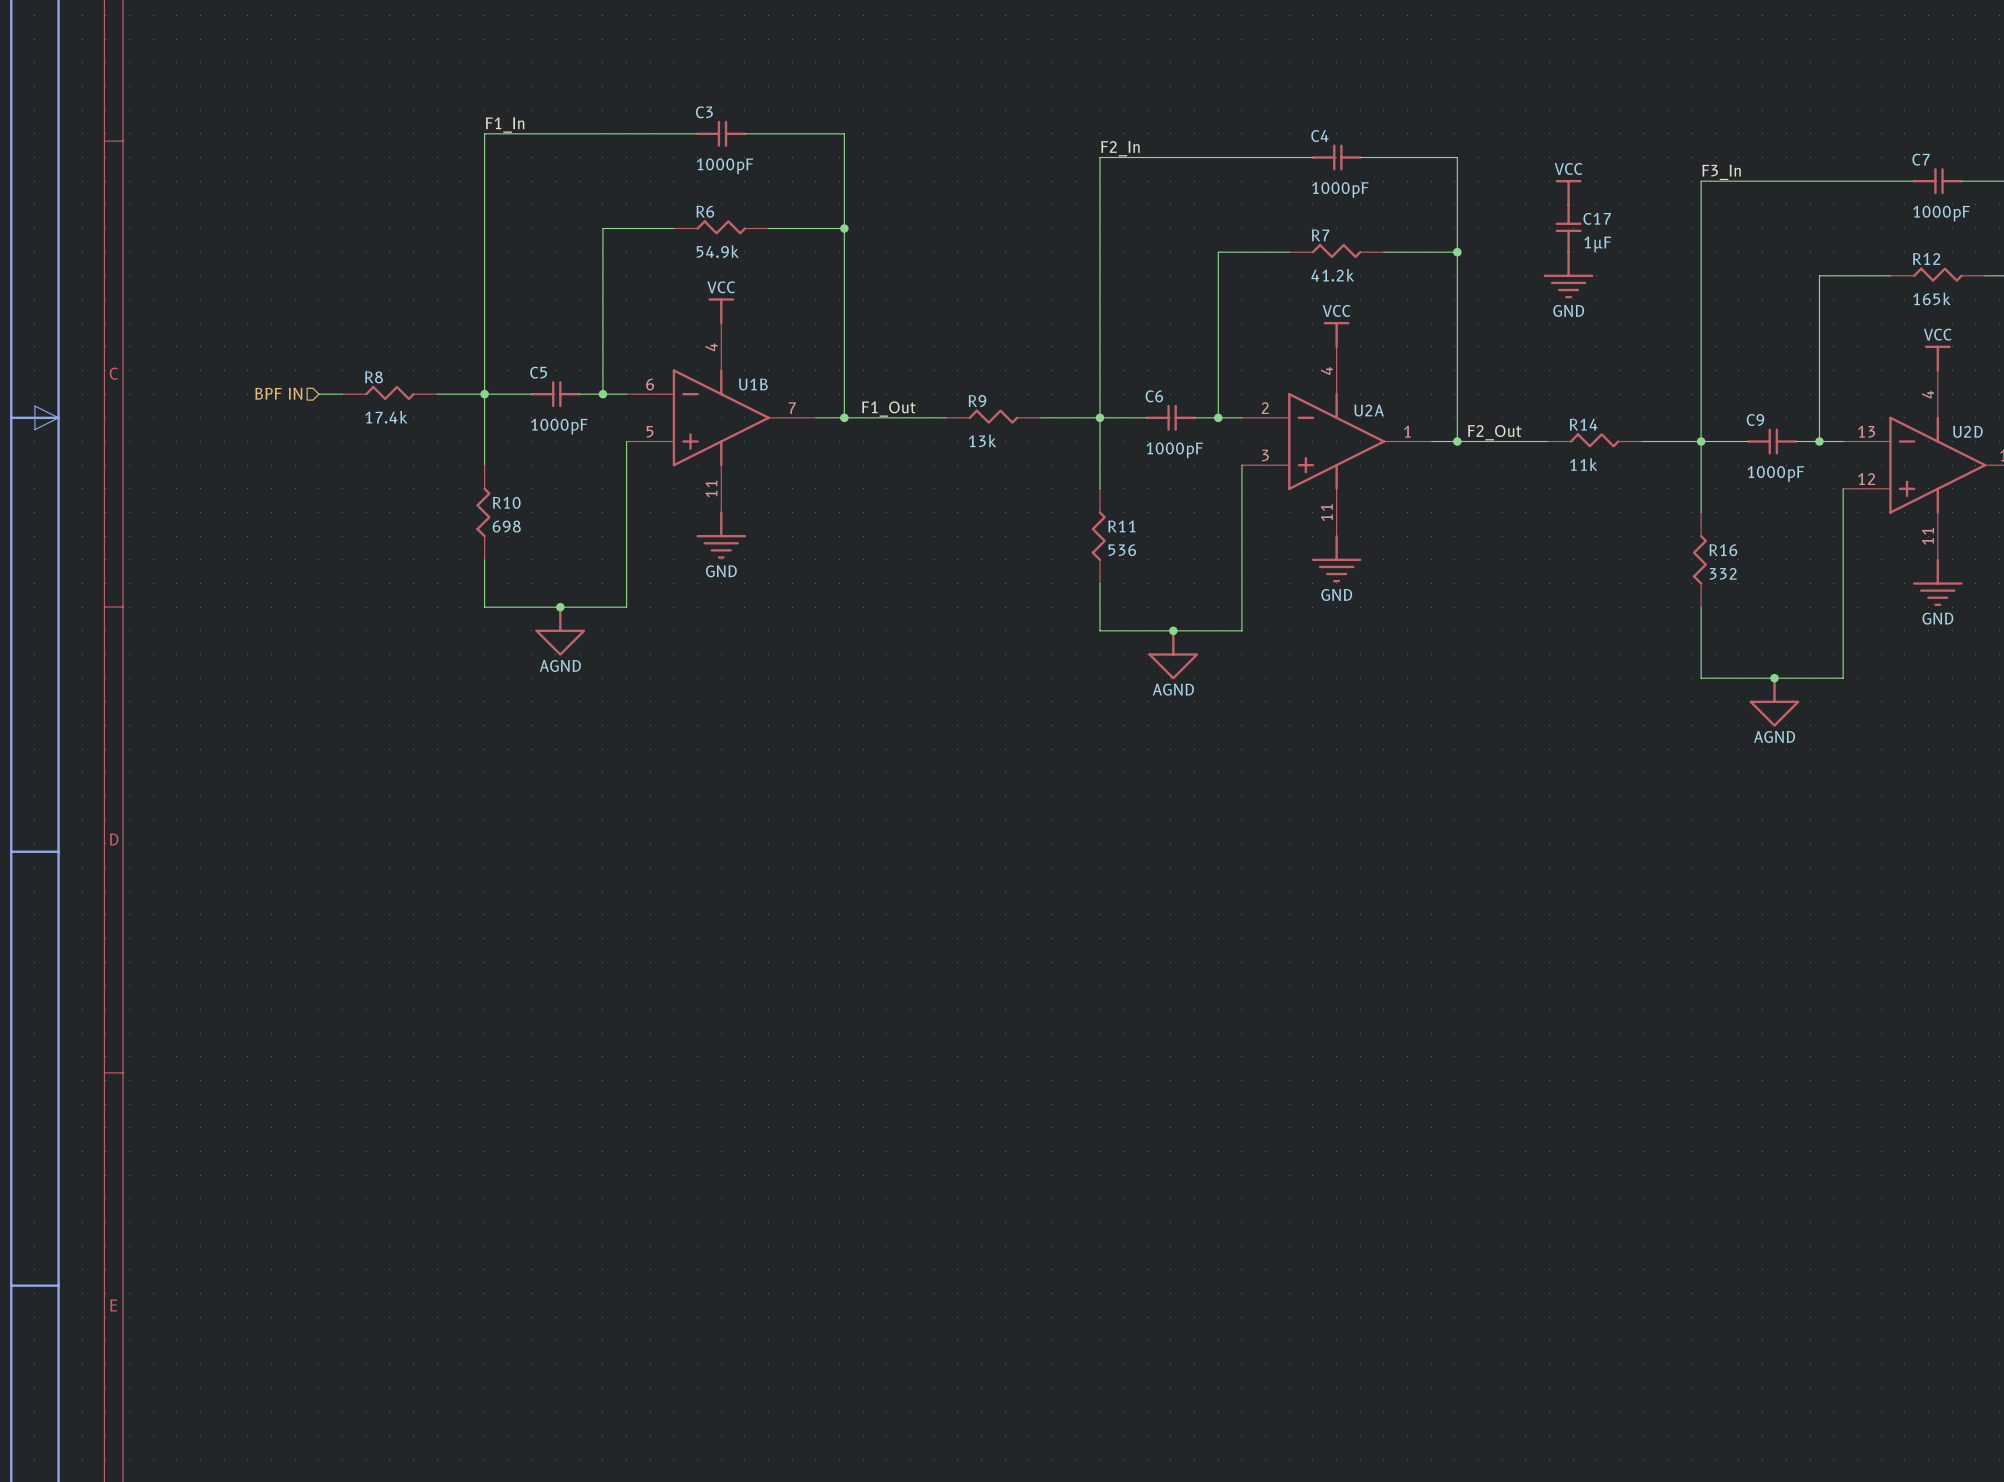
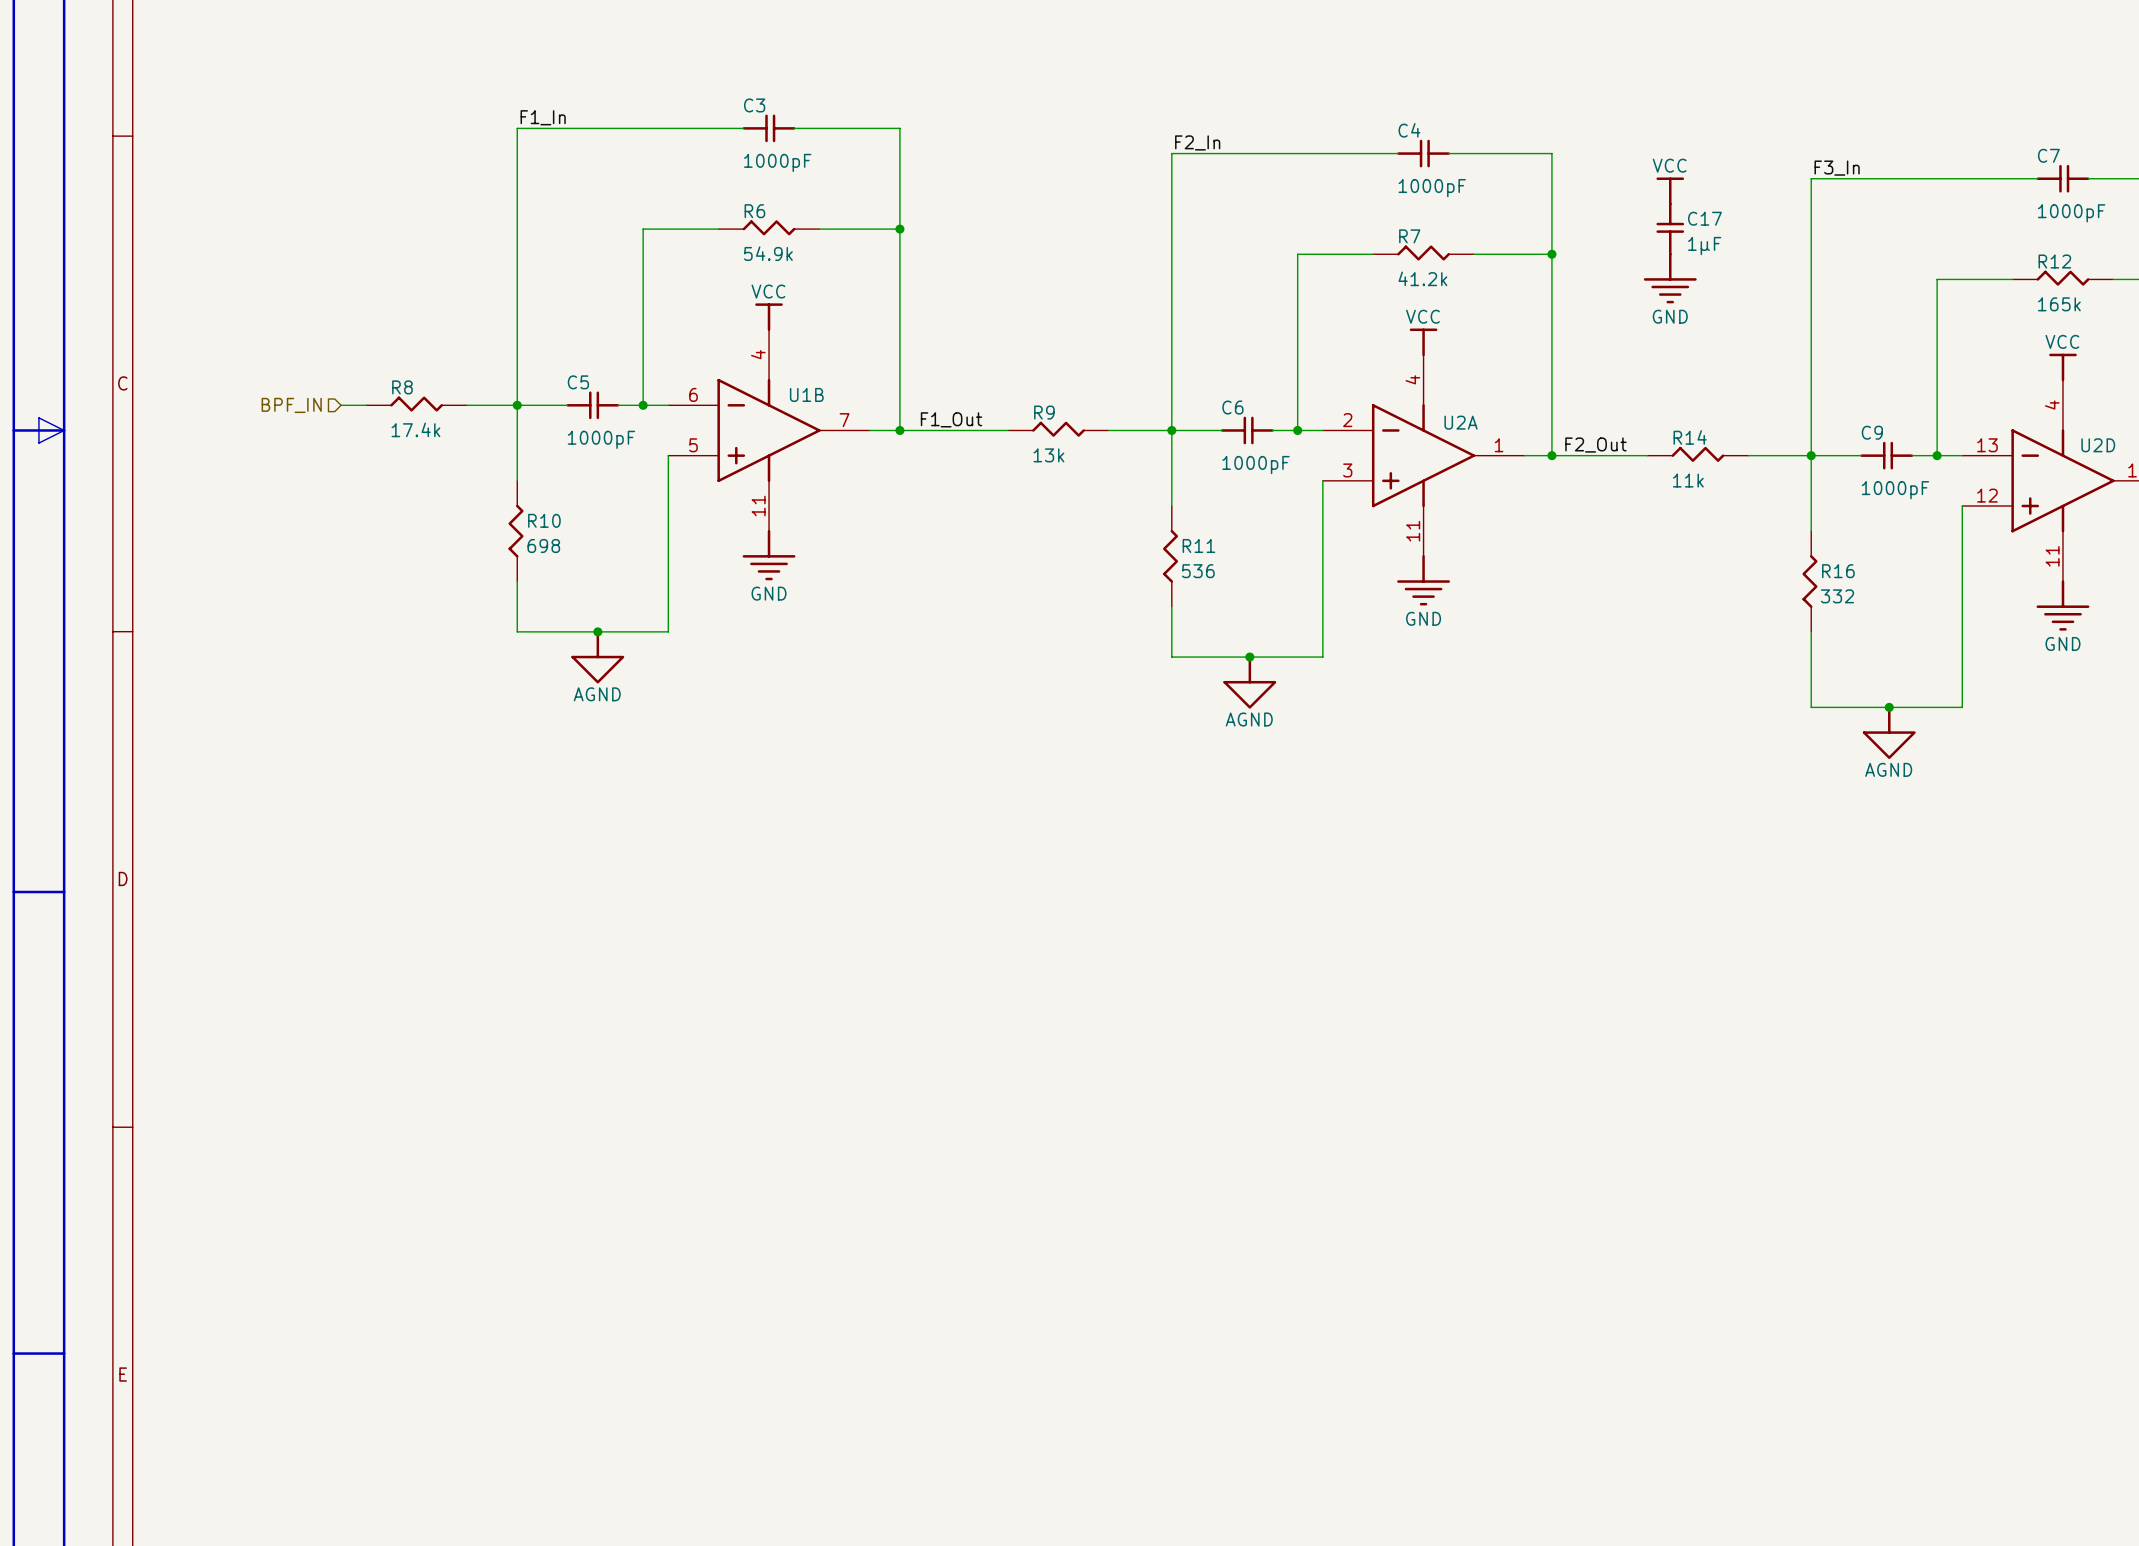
hierarchical label: BPF IN (278, 393) -> BPF_IN (291, 405)

